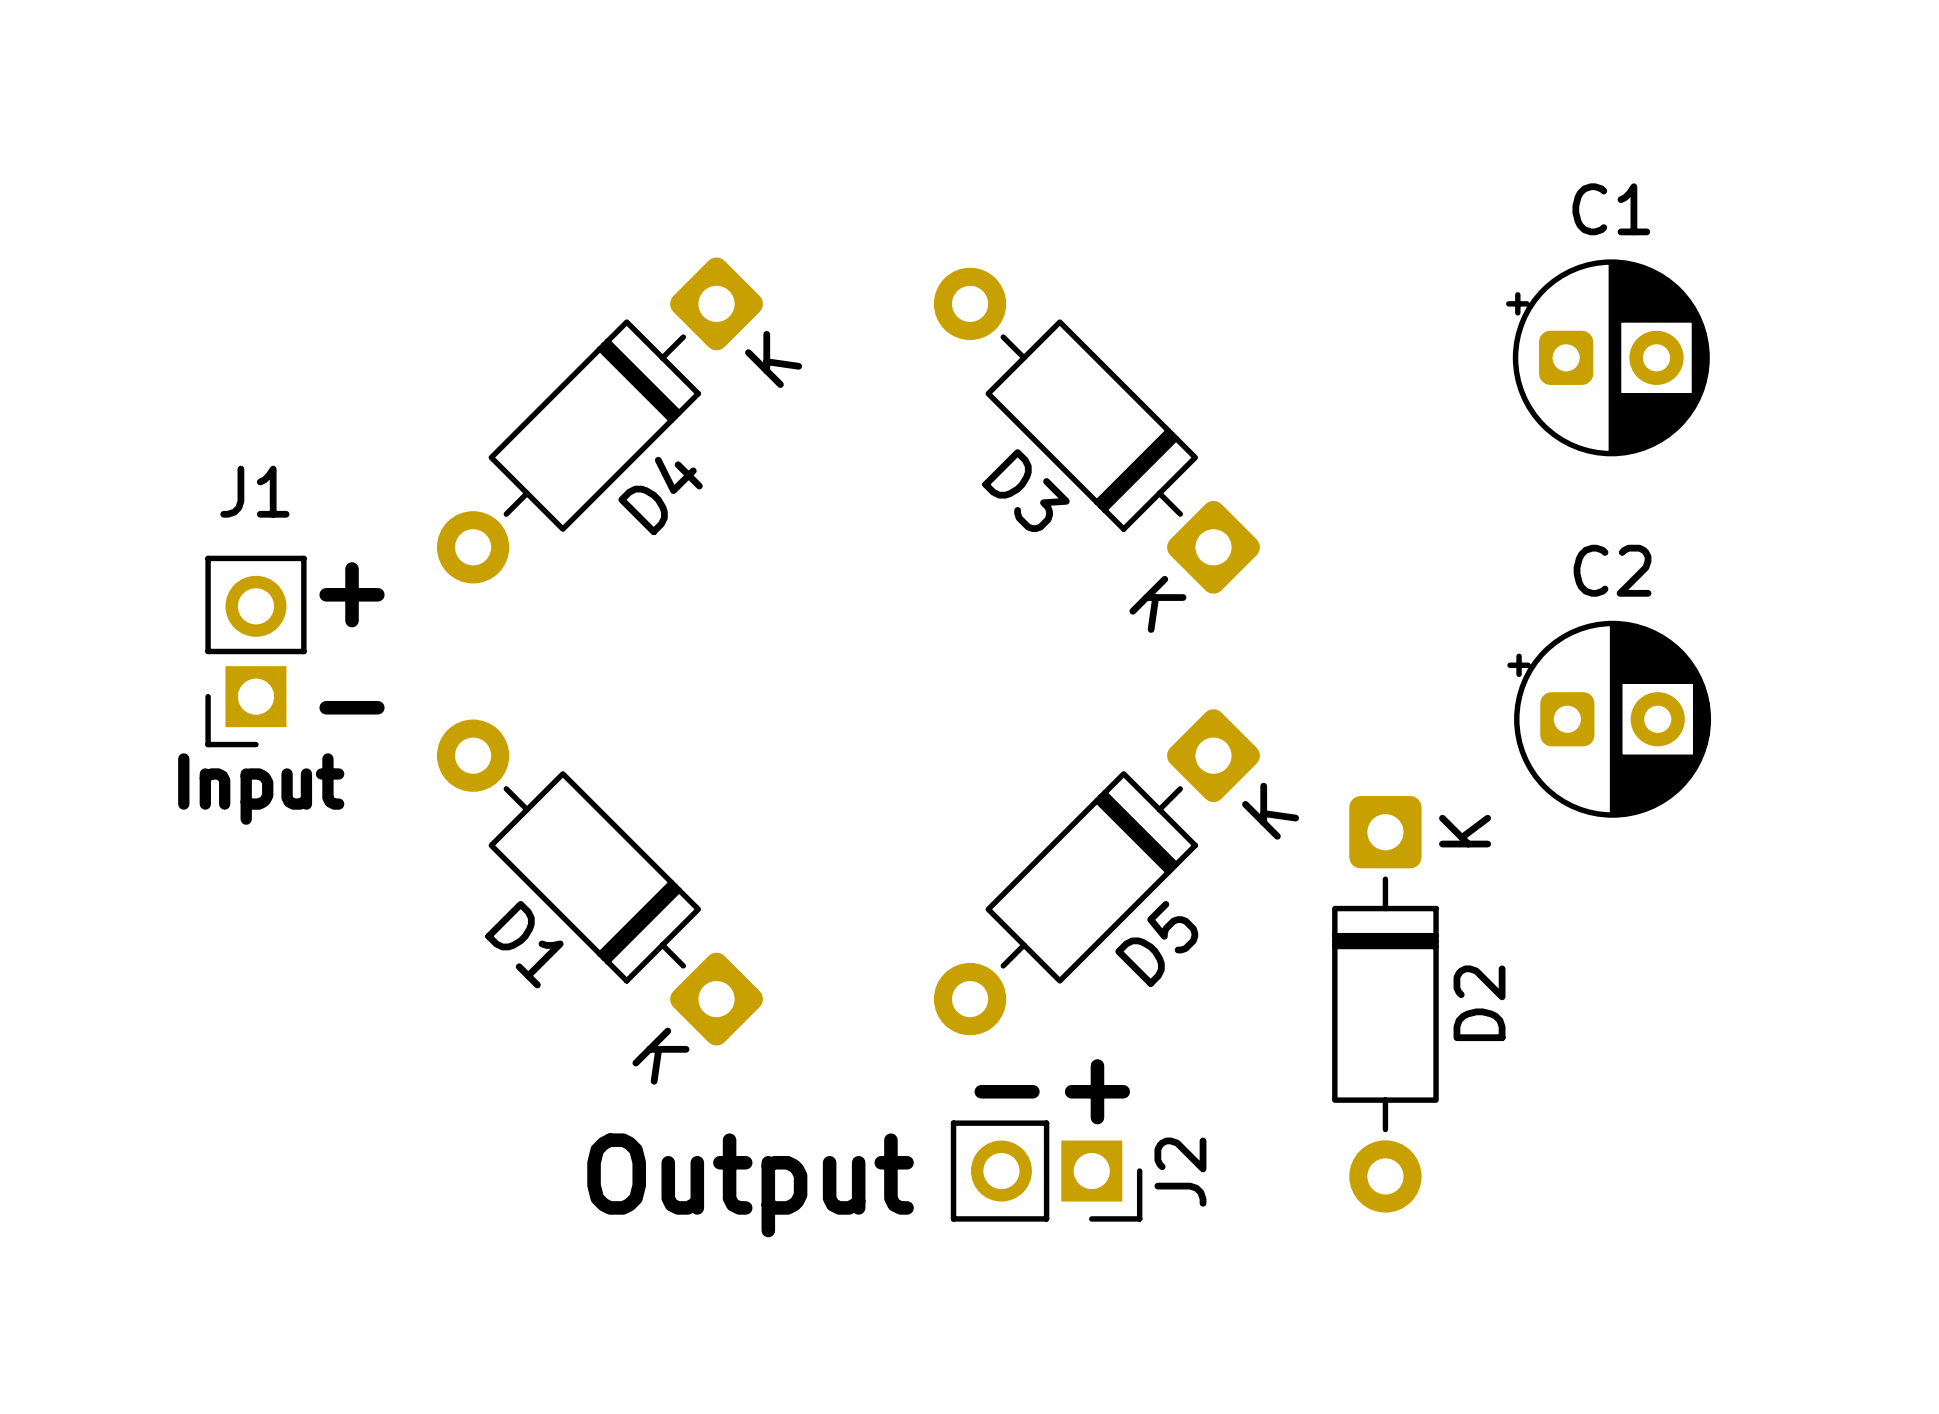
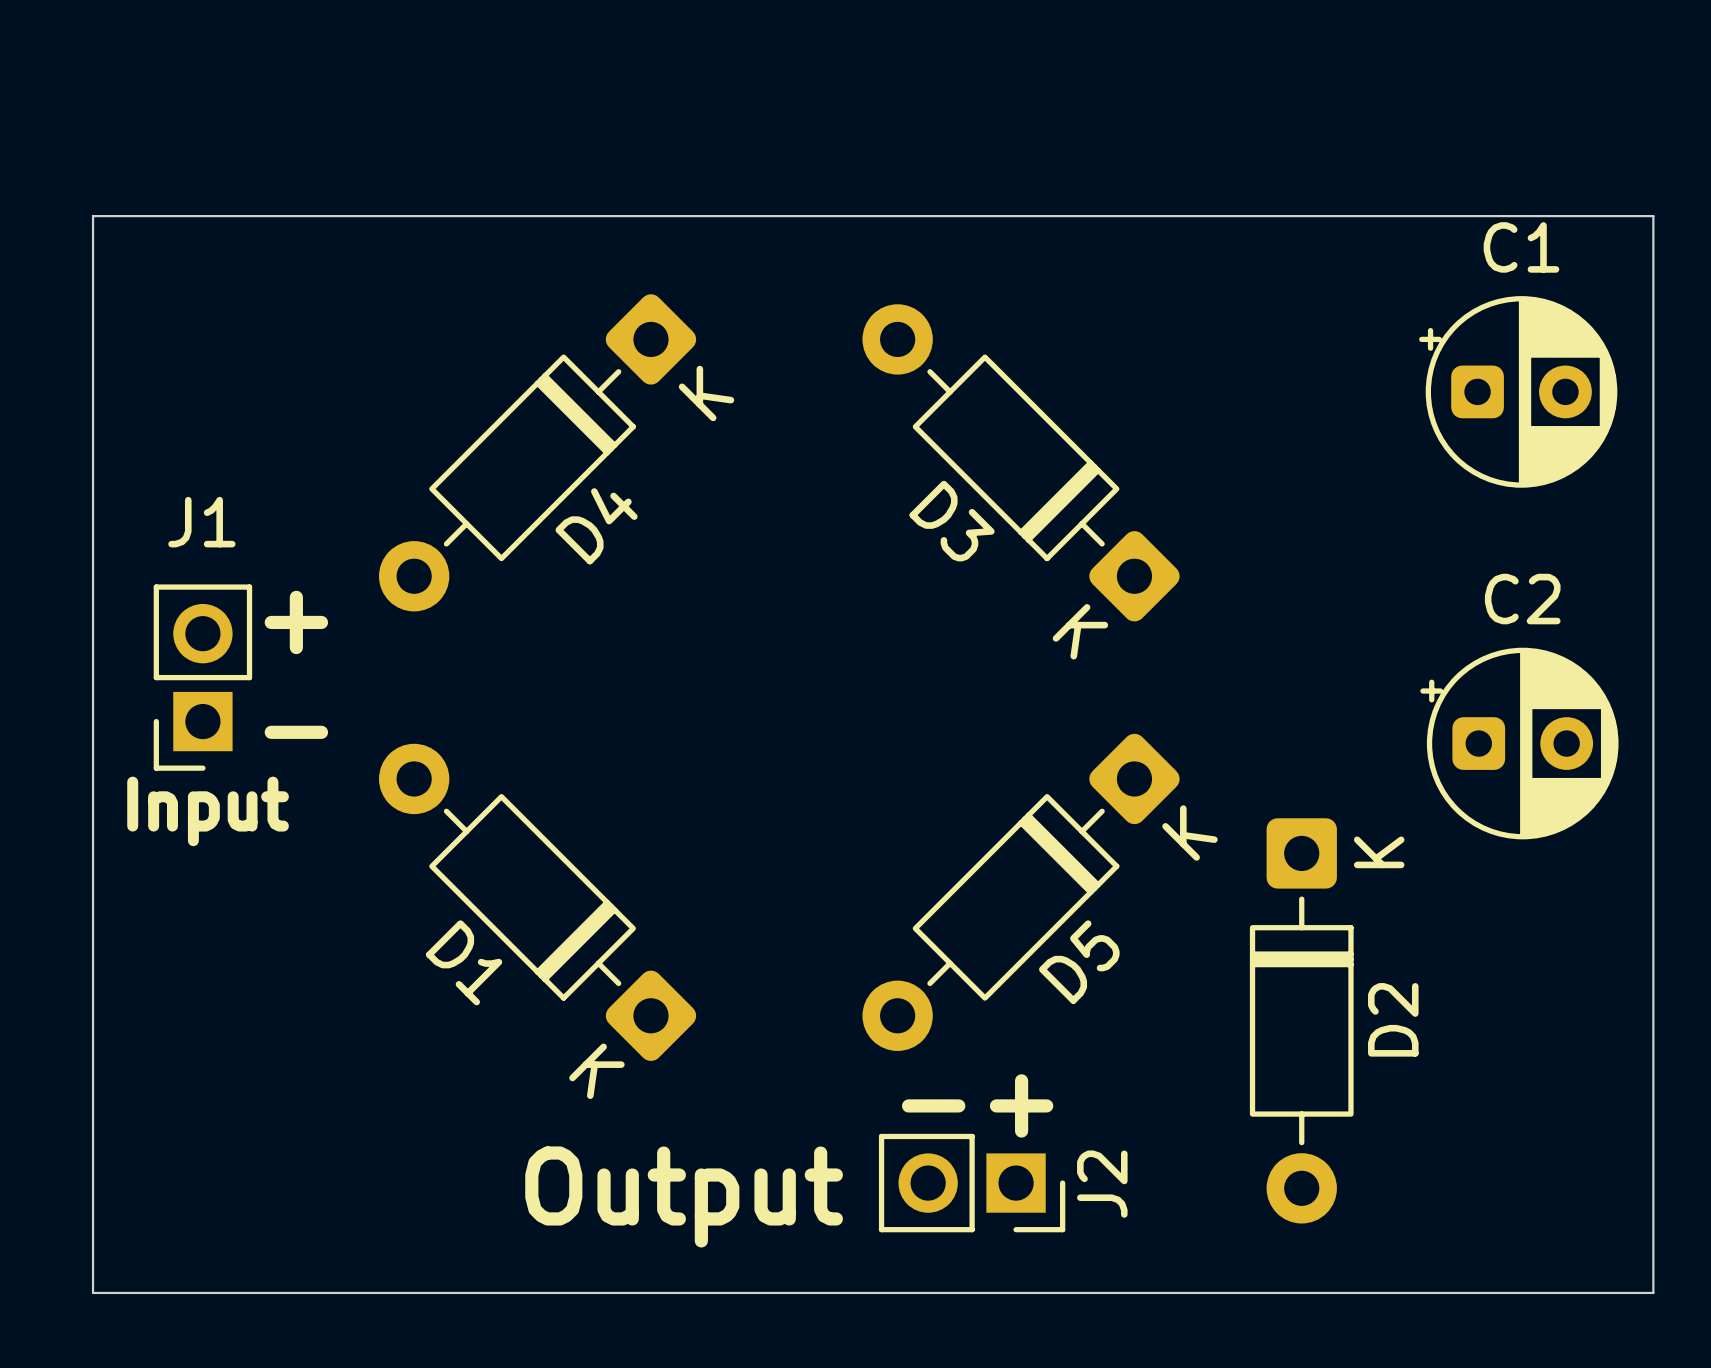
board edge: none -> (93, 216) (1653, 216) (1653, 1292) (93, 1292) (93, 216)

